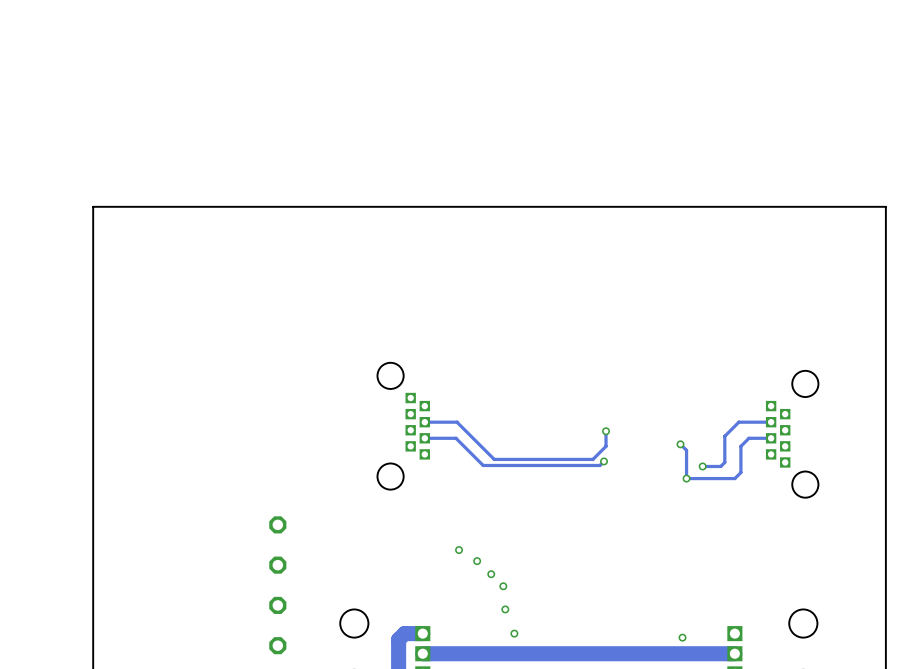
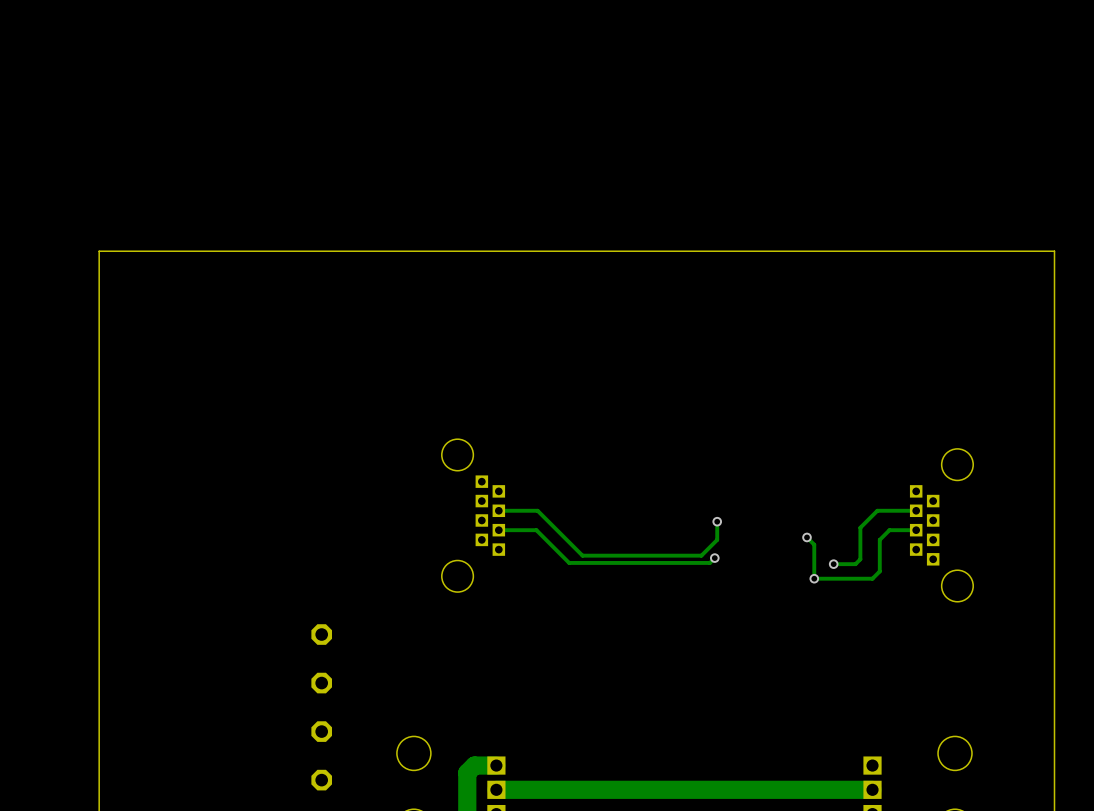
via: (459, 550) -> none
via: (477, 561) -> none
via: (491, 574) -> none
via: (503, 586) -> none
via: (505, 609) -> none
via: (514, 633) -> none
via: (682, 637) -> none

